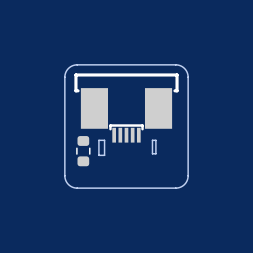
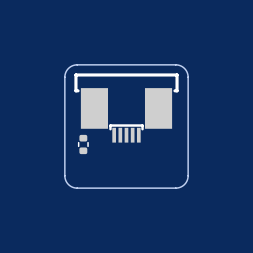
part footprint: [76, 136, 91, 167] -> [77, 134, 89, 155]
board edge: (104, 140) (98, 140) (98, 155) (104, 155) (104, 140) -> none
board edge: (155, 140) (152, 140) (152, 153) (155, 153) (155, 140) -> none

